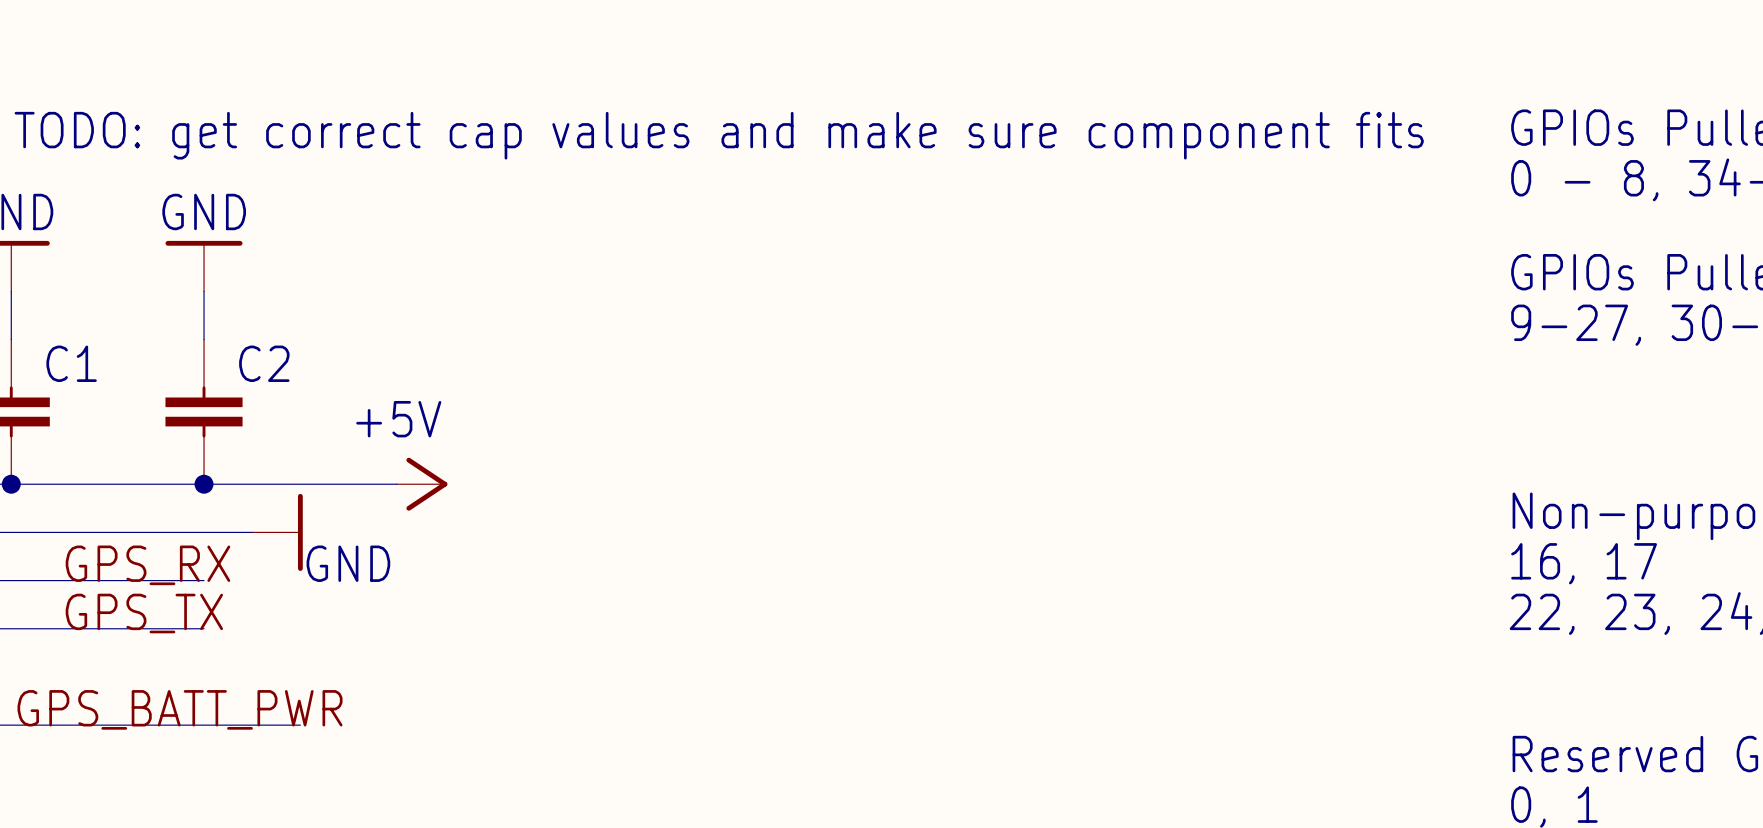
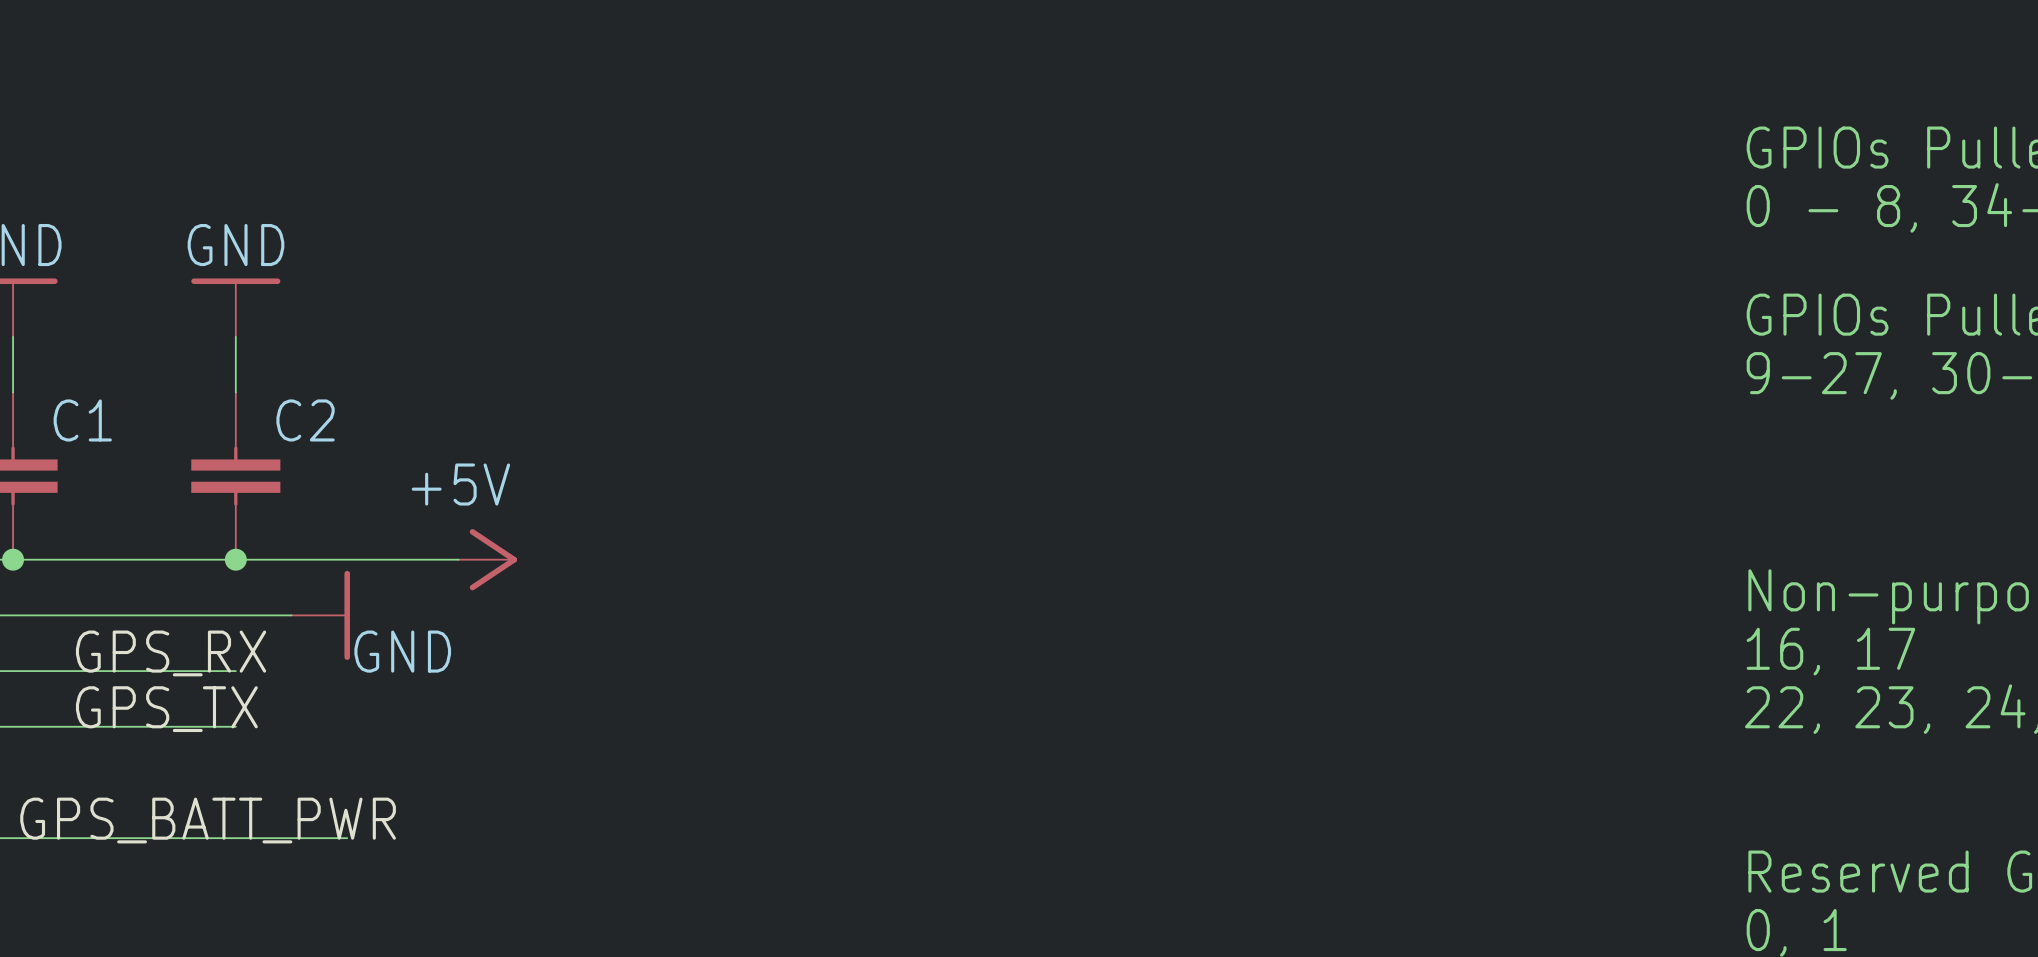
text: TODO: get correct cap values and make sure component fits (719, 135) -> none

